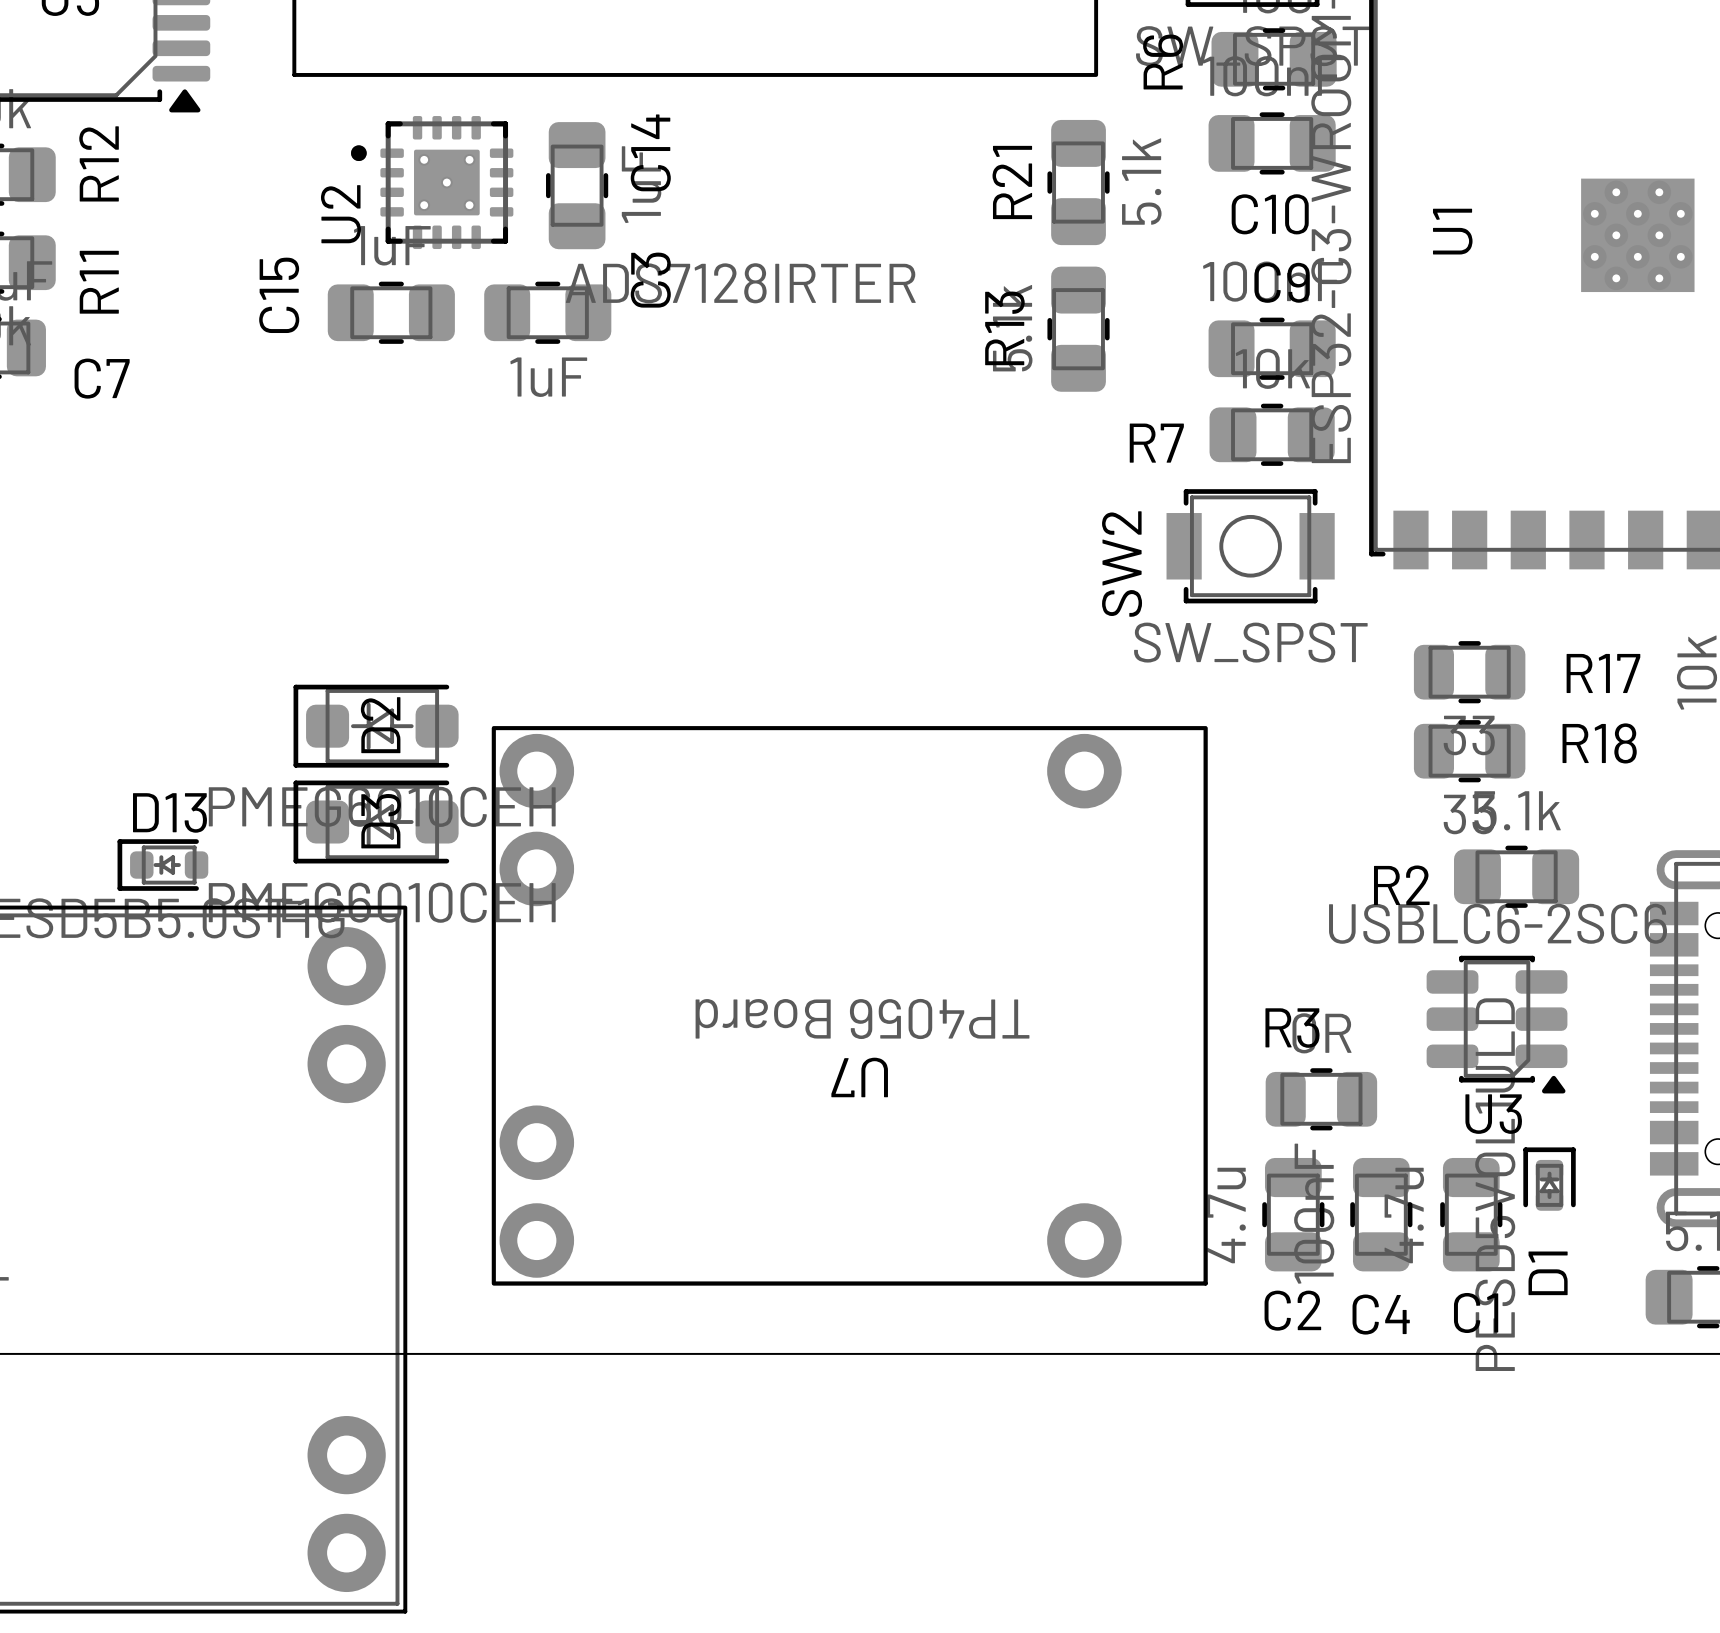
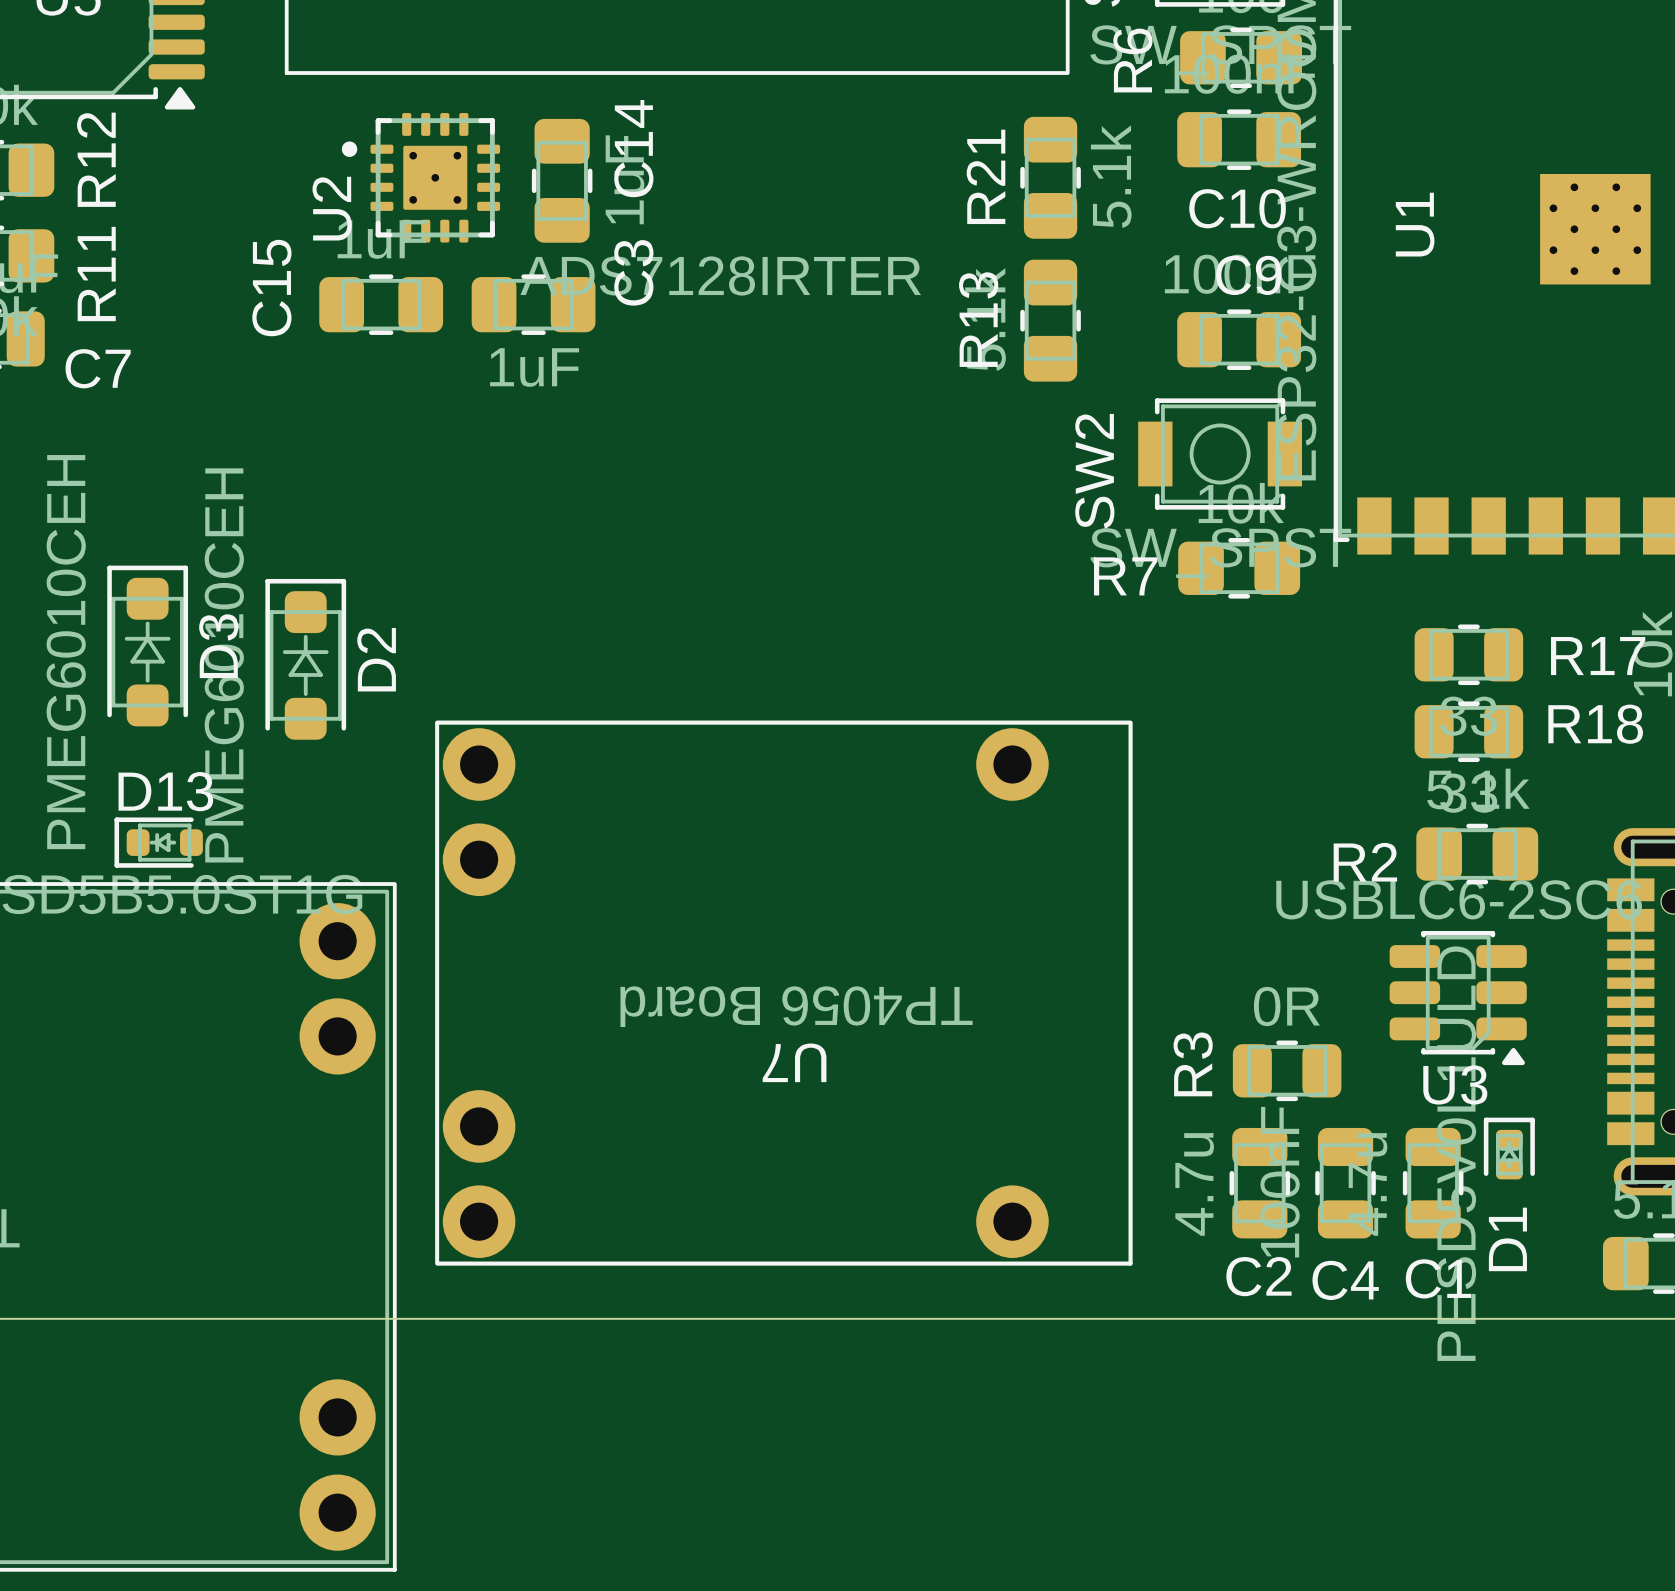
R7 position: (1272, 434) -> (1239, 568)
SW2 position: (1250, 546) -> (1220, 454)
R17 position: (1469, 672) -> (1468, 654)
D2 rotation: 0° (376, 726) -> 90° clockwise (305, 659)
R18 position: (1469, 751) -> (1468, 731)
D3 rotation: 0° (376, 822) -> 90° clockwise (147, 646)
D3 position: (376, 822) -> (147, 646)
U7 position: (849, 1005) -> (783, 993)
R3 name rotation: 0° (1292, 1028) -> 90° counterclockwise (1193, 1064)

